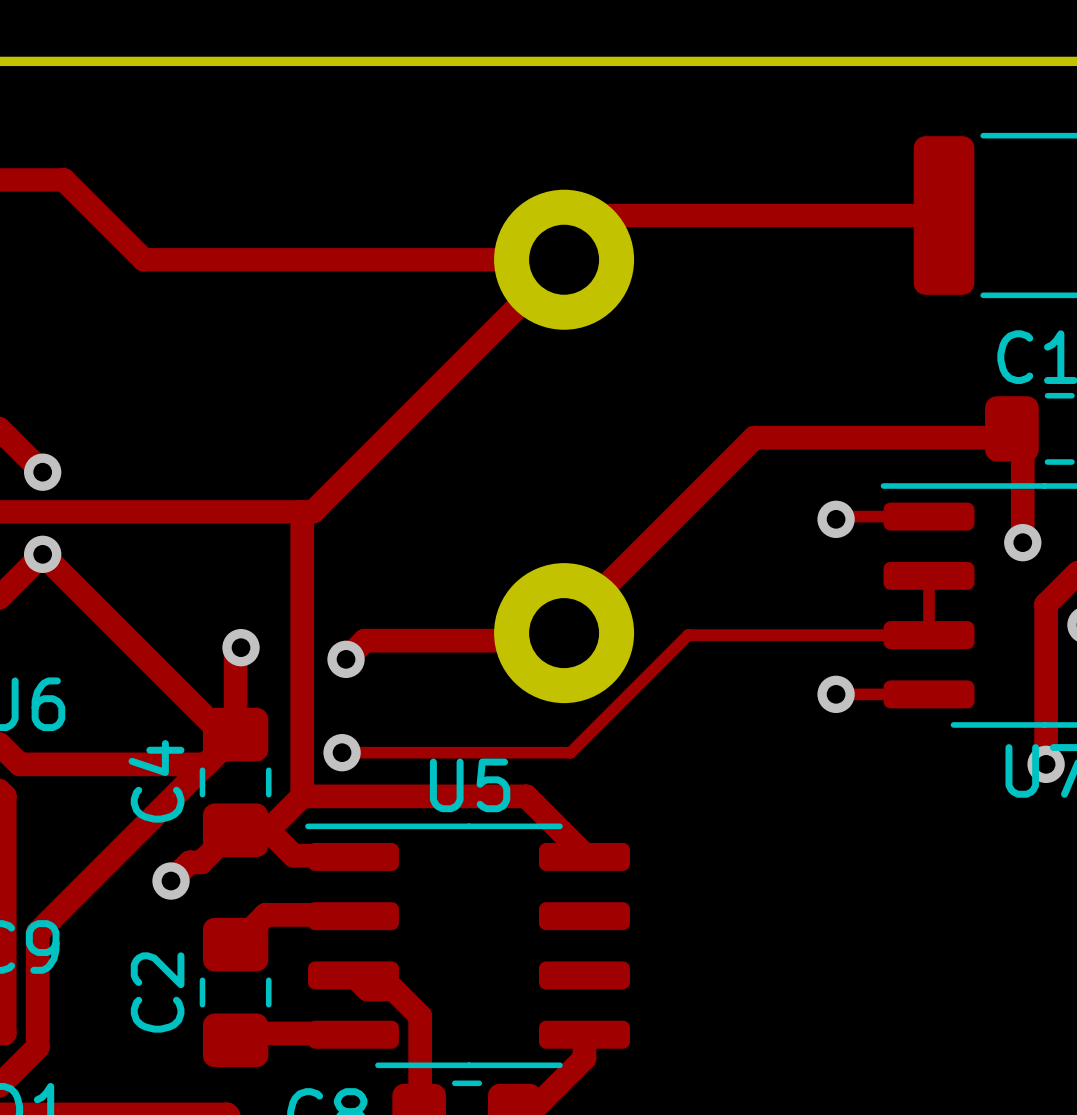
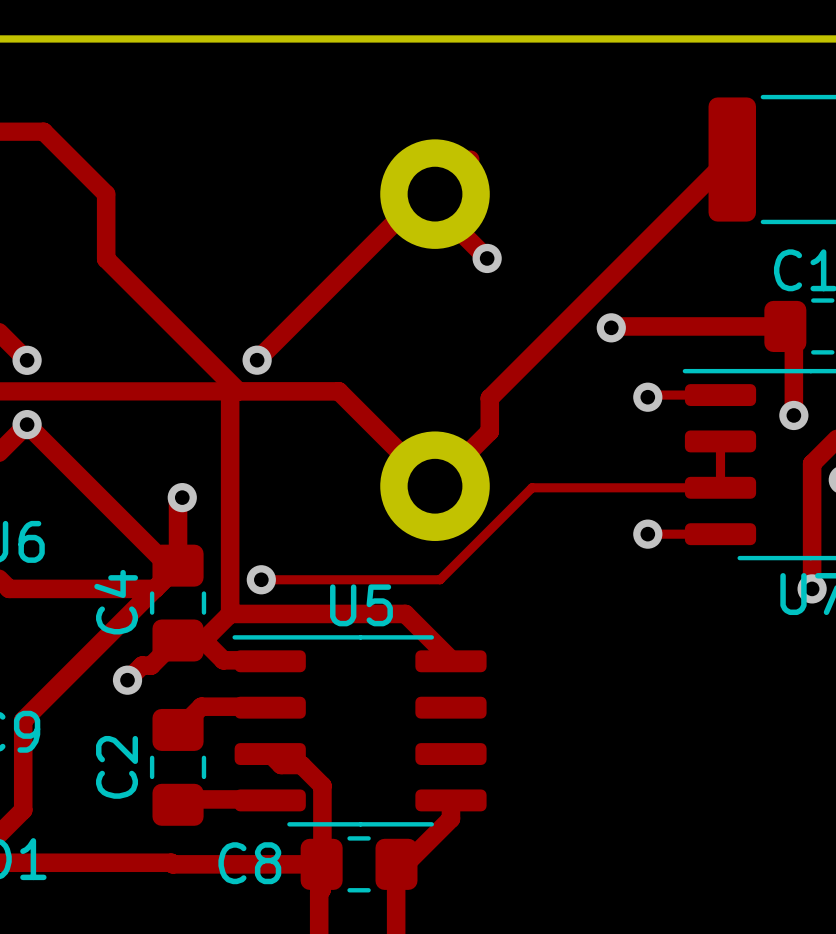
track: none -> (731, 156) (489, 398) (489, 431) (435, 486)
track: (609, 215) (929, 215) -> none
track: (143, 259) (564, 259) -> (105, 194) (103, 192) (106, 194) (106, 259) (238, 391) (338, 391) (436, 488)
track: (561, 262) (312, 511) -> none
track: none -> (487, 258) (436, 207) (436, 196) (420, 196) (257, 360)
via: none -> (487, 258)
track: none -> (785, 326) (611, 327)
via: none -> (611, 327)
track: (1011, 437) (754, 437) (551, 640) (364, 640) (346, 659) -> none
via position: (346, 659) -> (257, 360)

